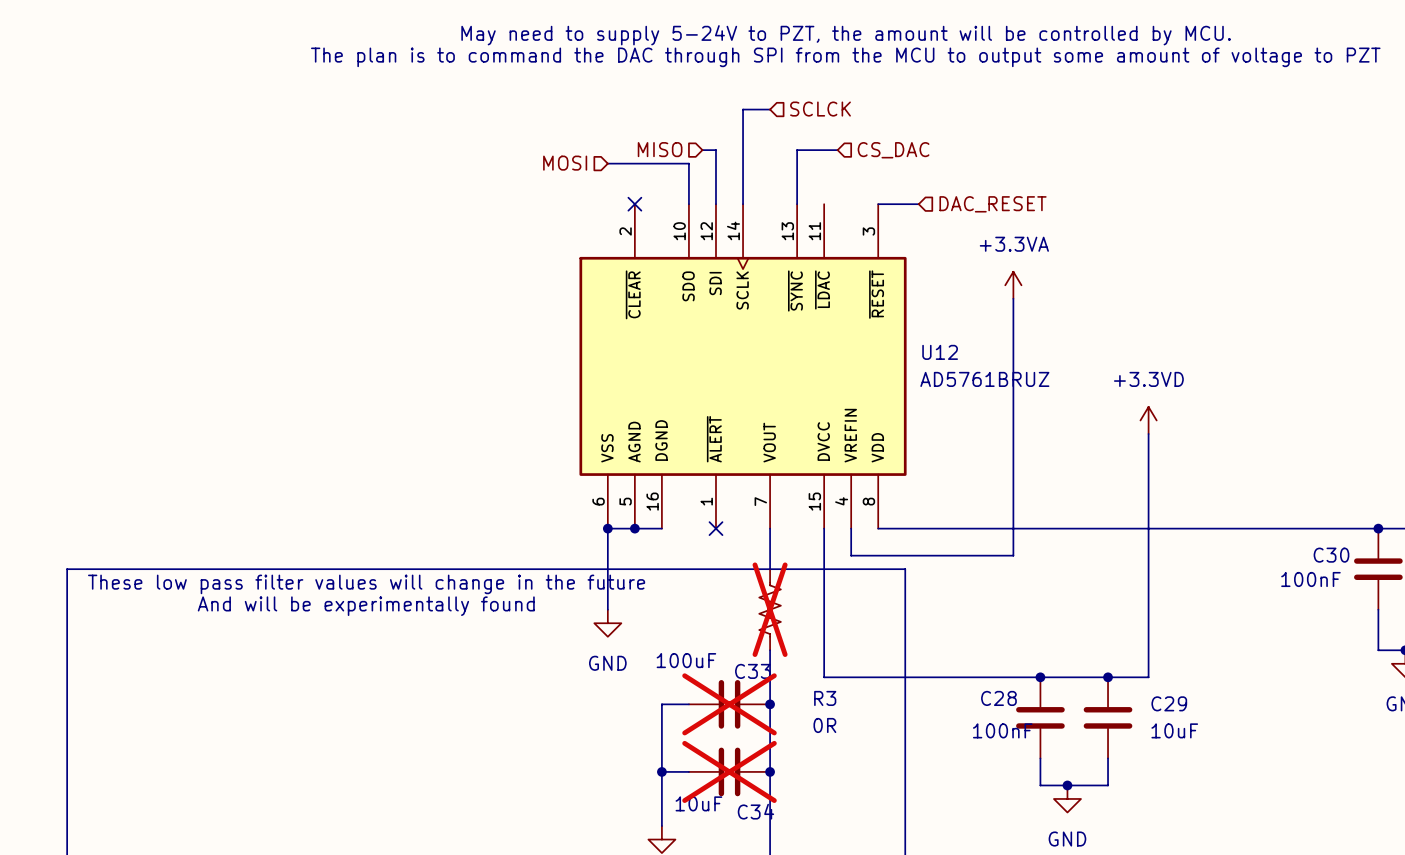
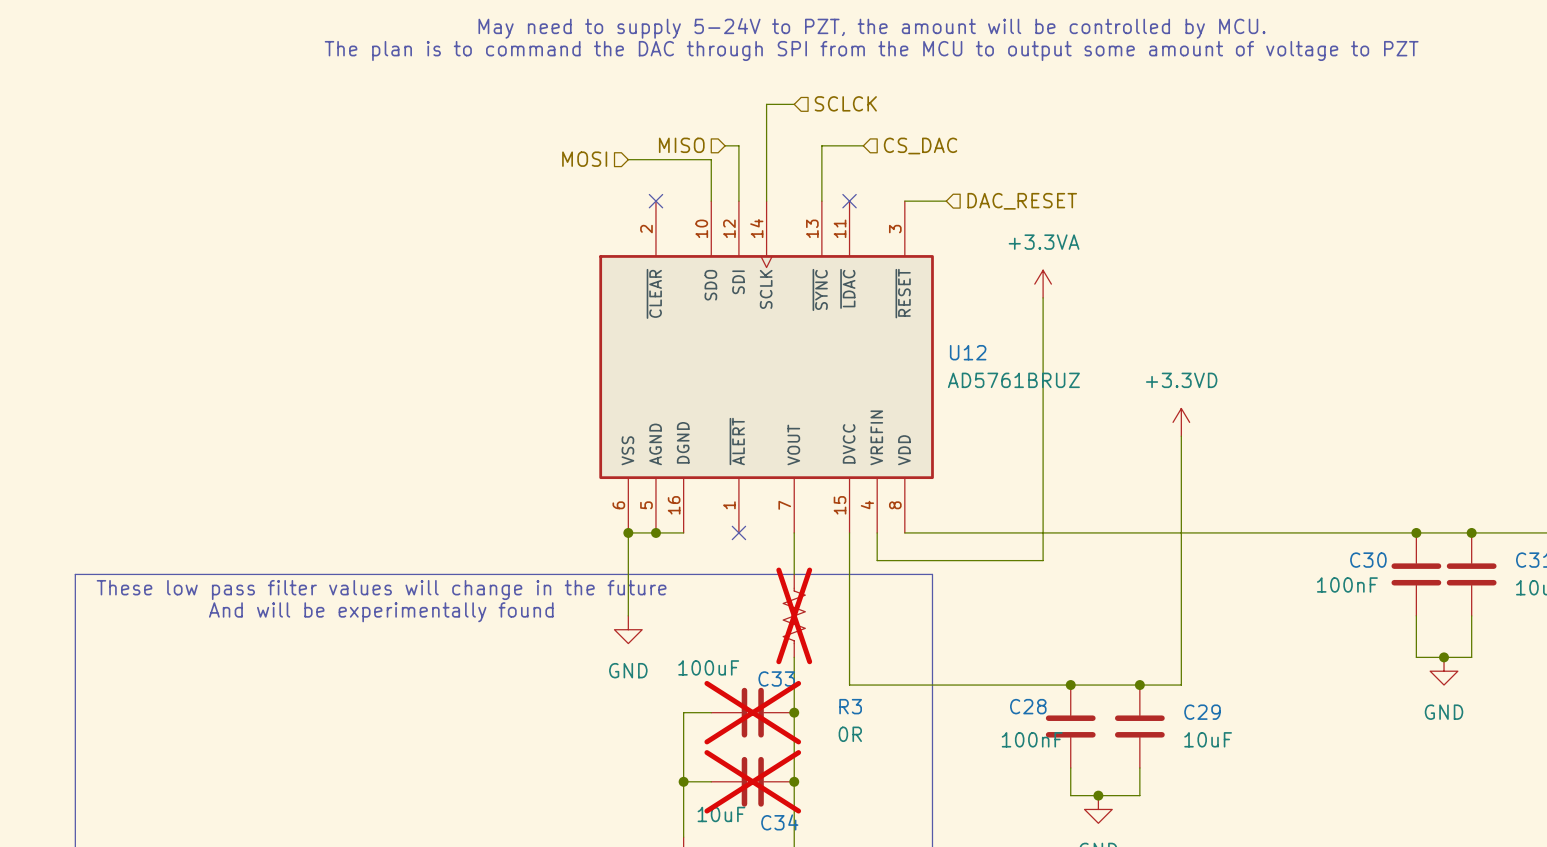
no-connect mark: none -> (849, 201)

